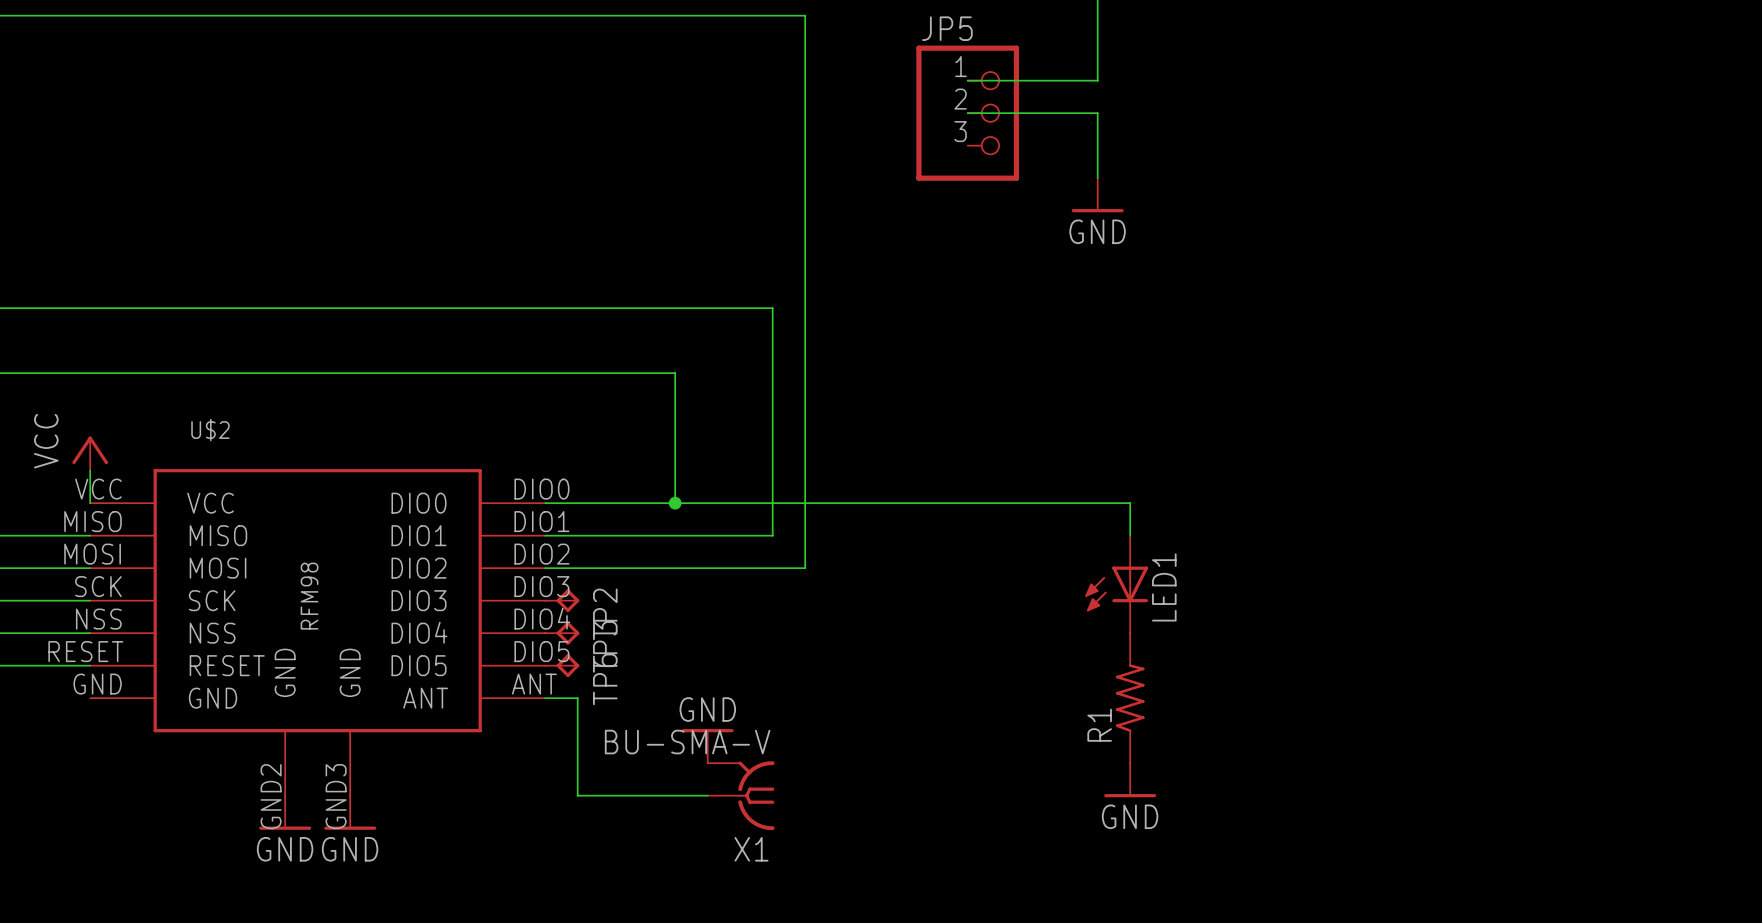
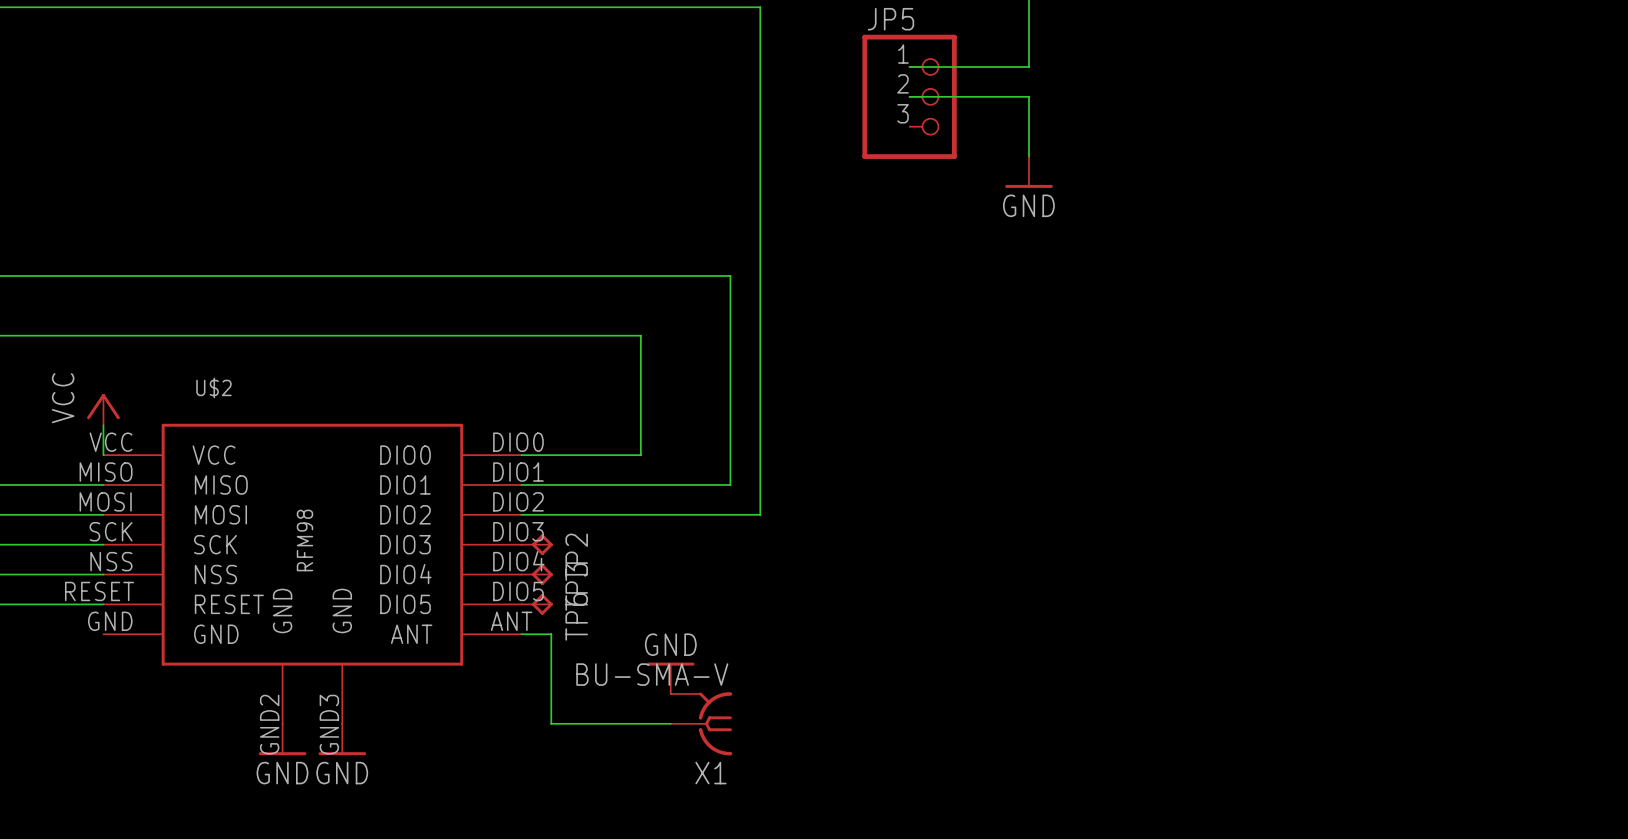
wire: (675, 503) (1130, 503) (1130, 535) -> none
junction: (675, 503) -> none
LED1: (1116, 584) -> none
R1: (1130, 698) -> none
power symbol: GND (1130, 780) -> none

